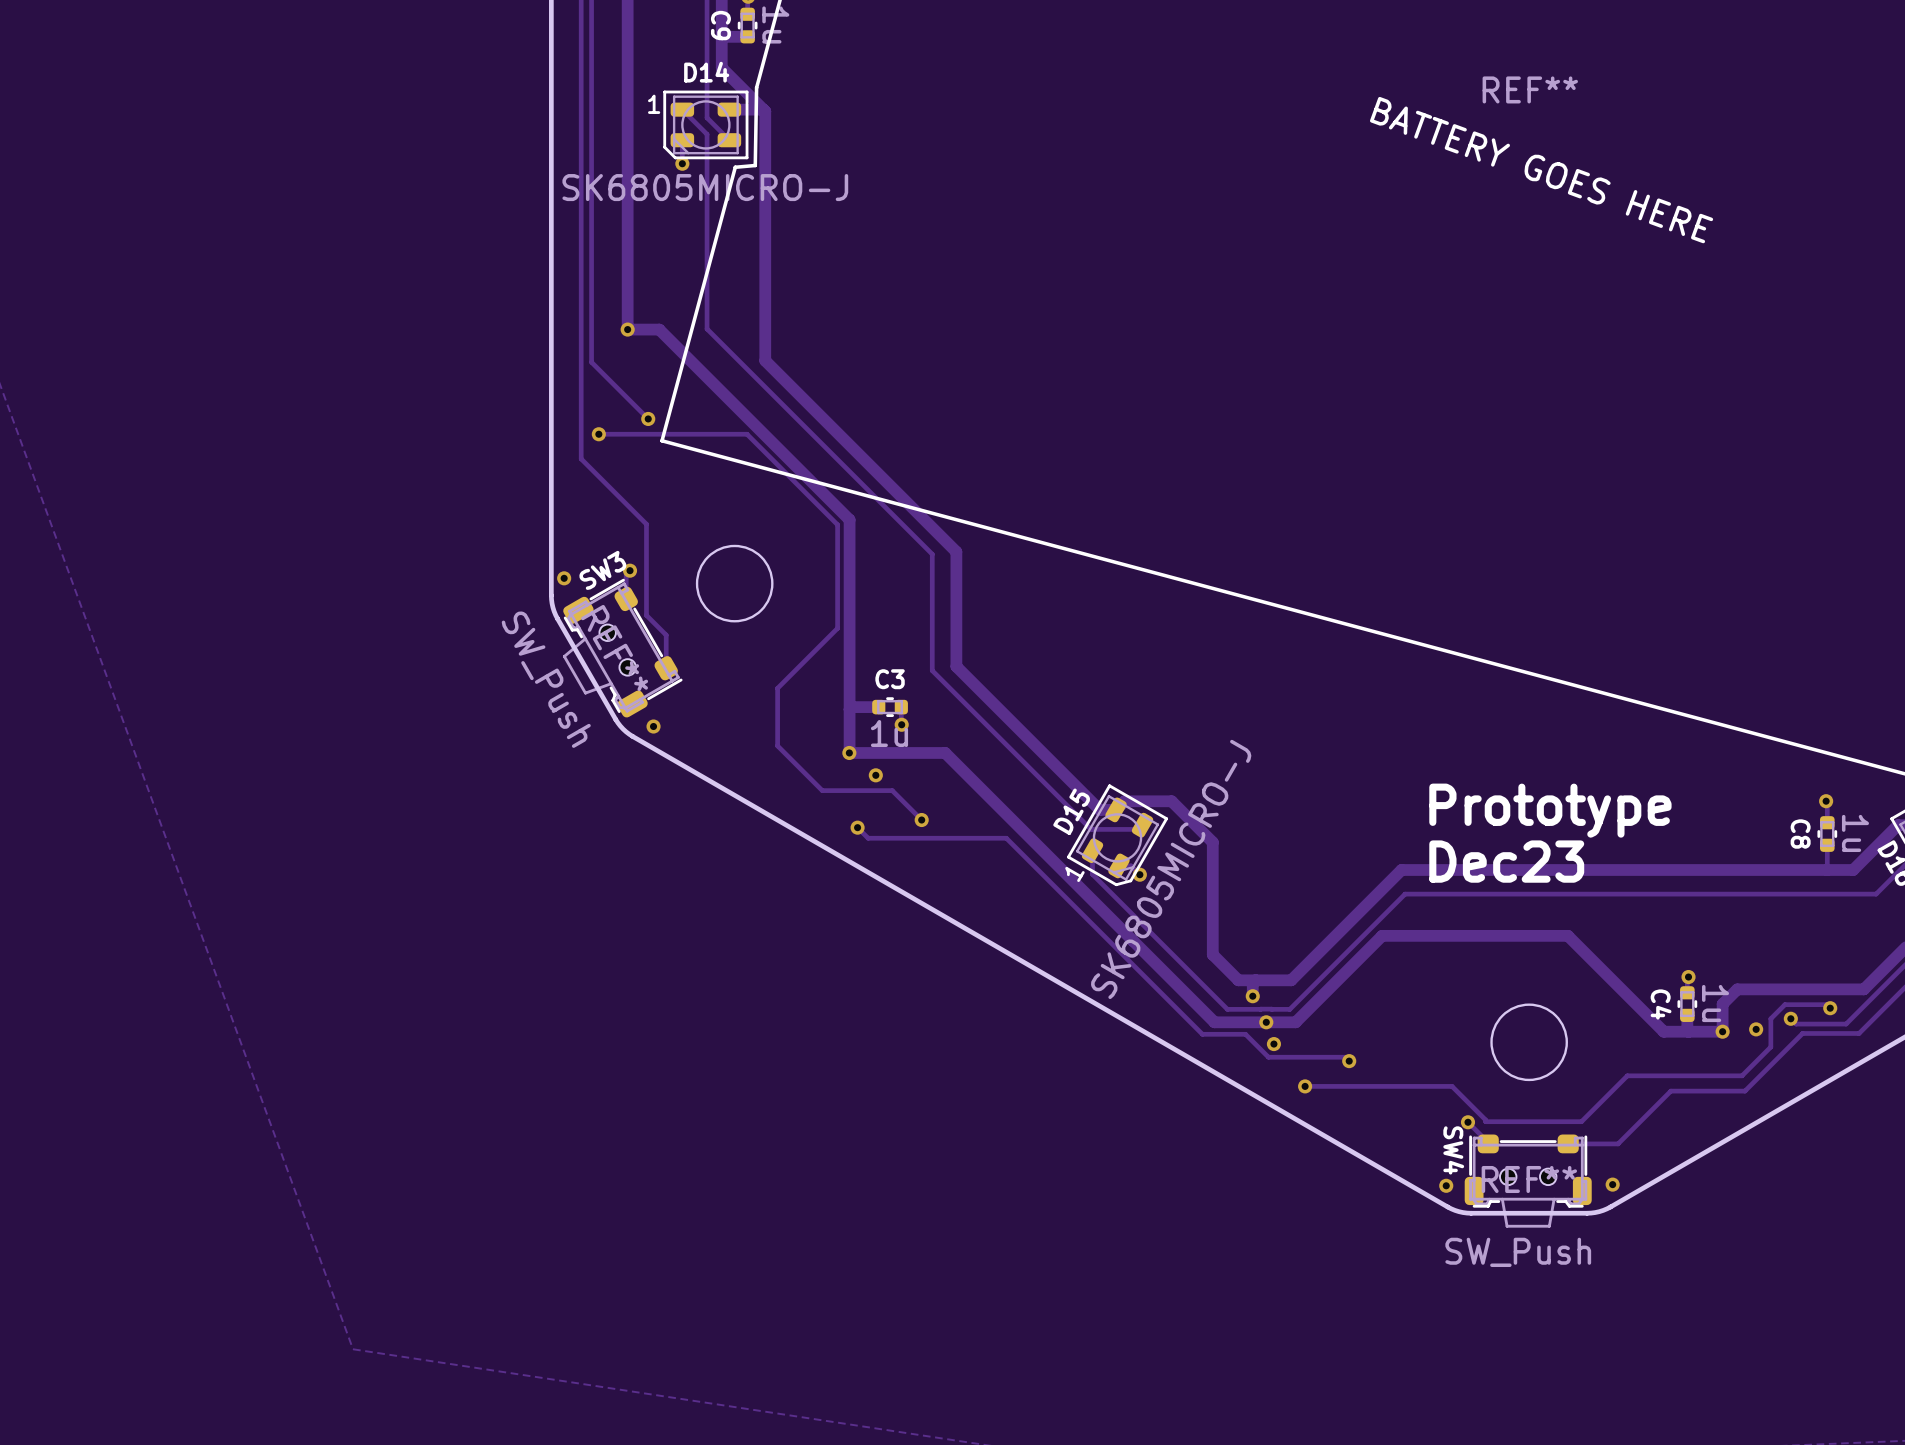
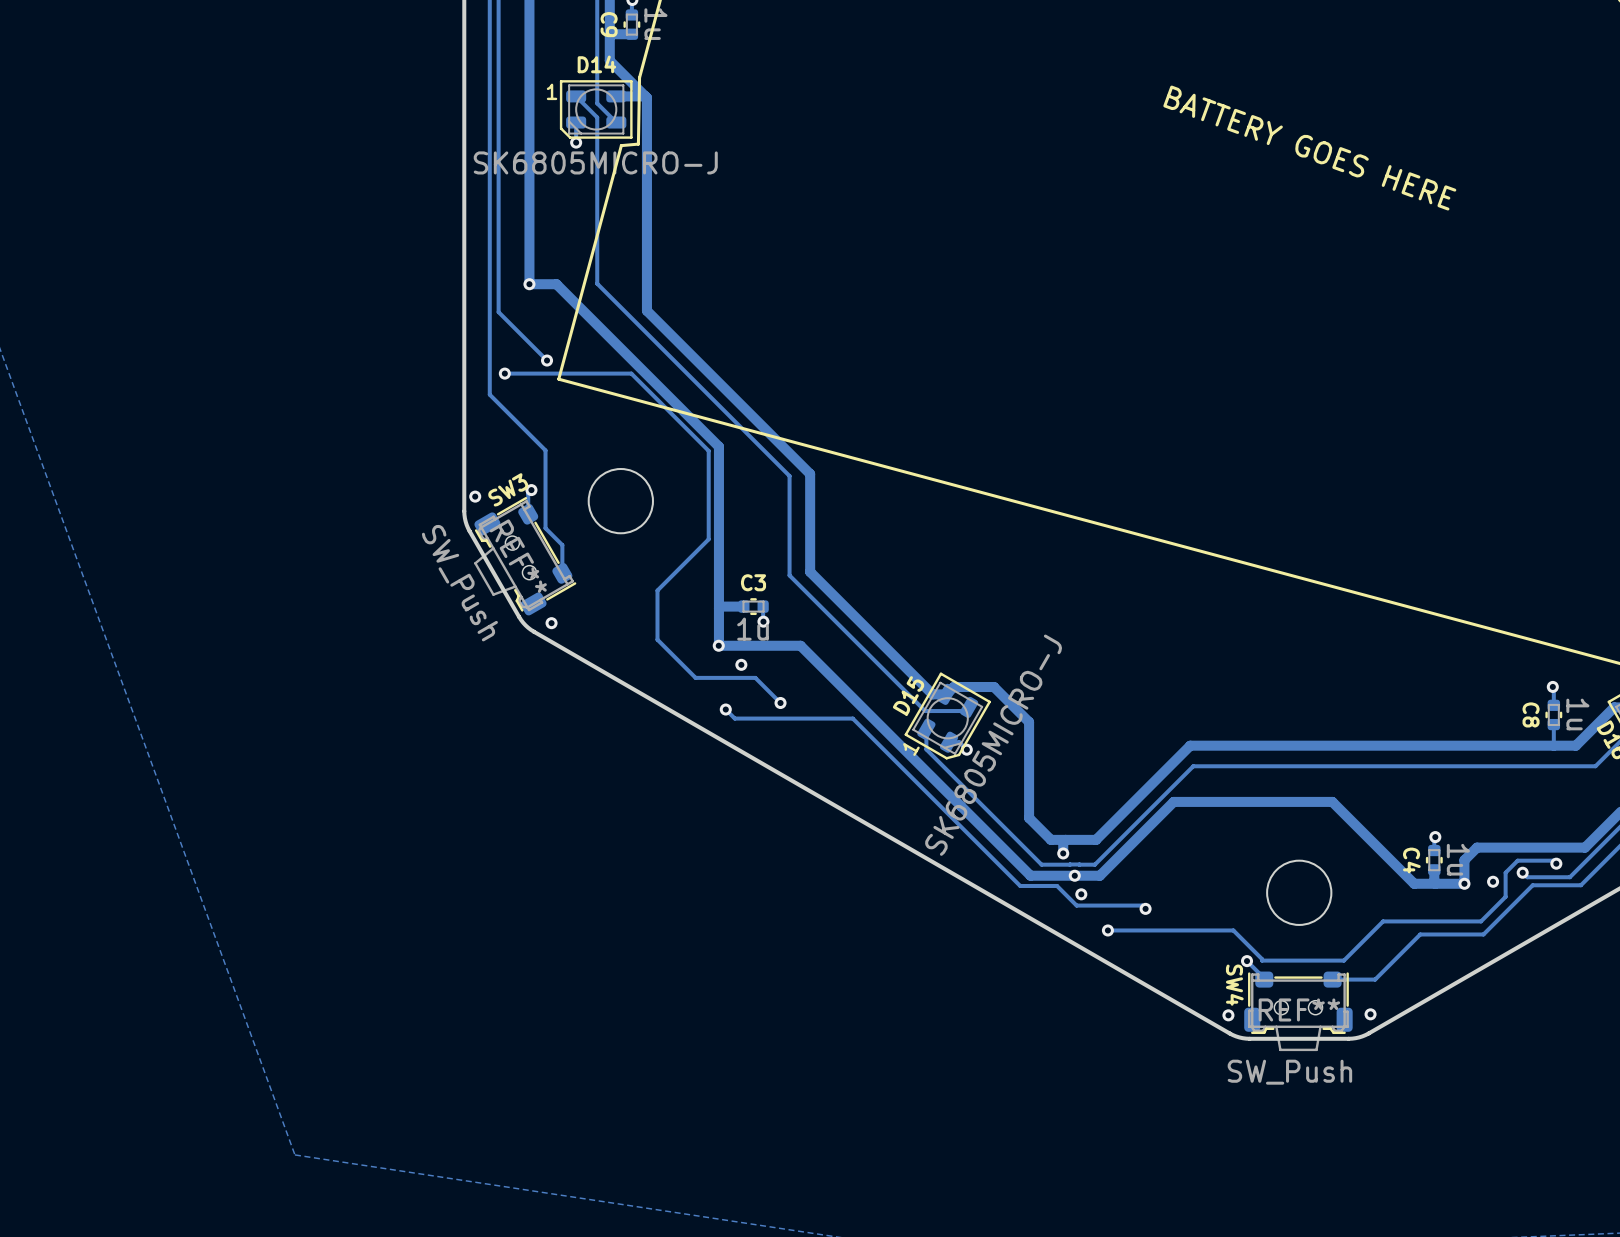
REF**: (1530, 89) -> none
text: Prototype (1550, 810) -> none
text: Dec23 (1506, 861) -> none

